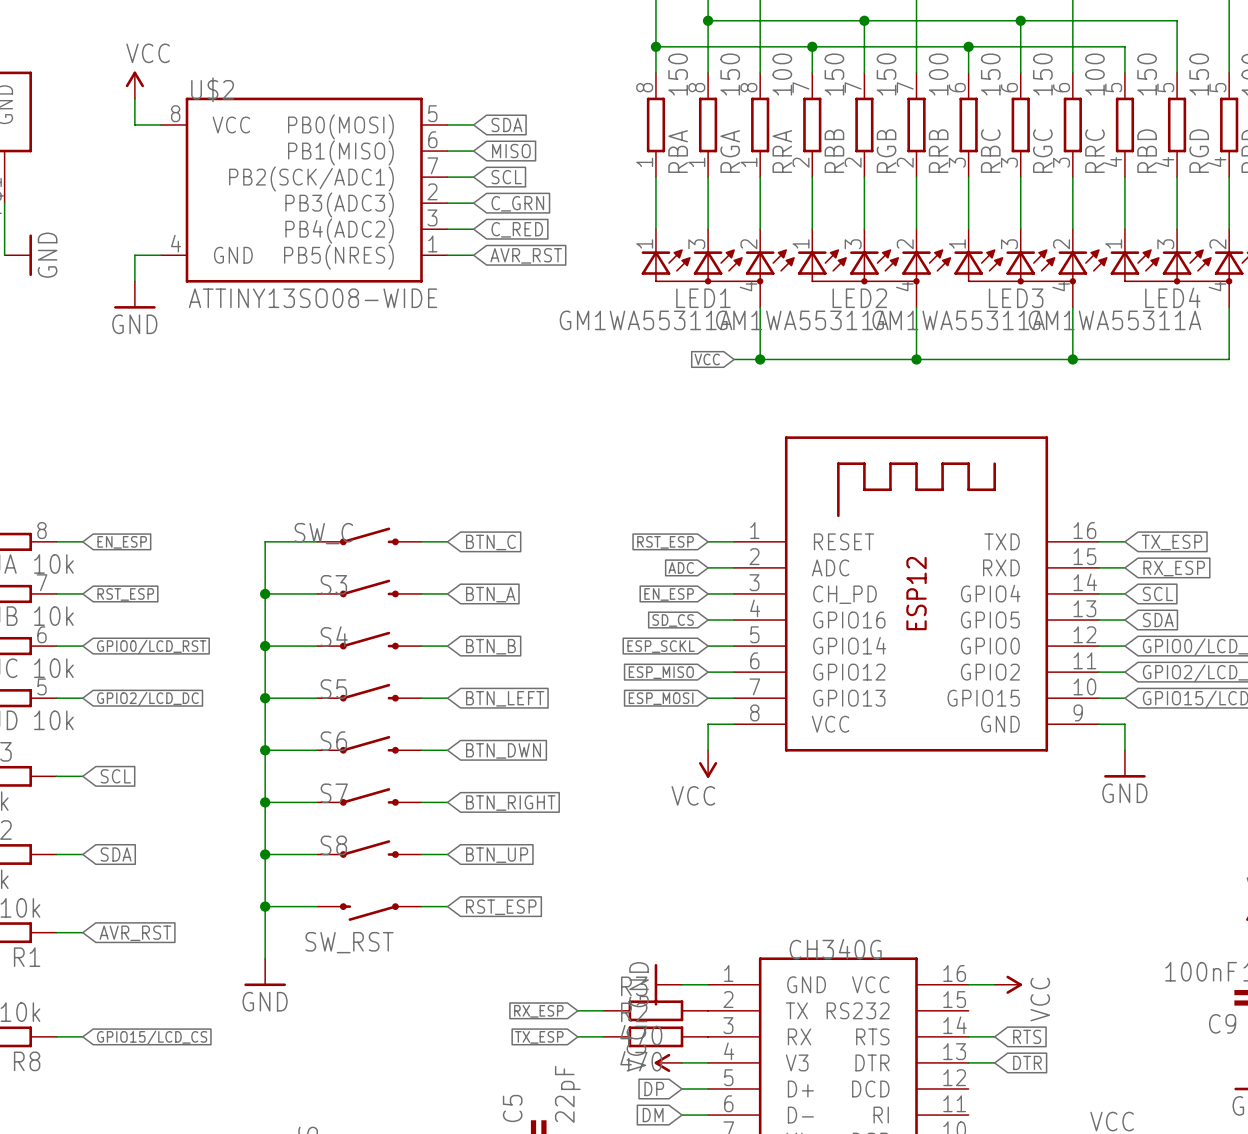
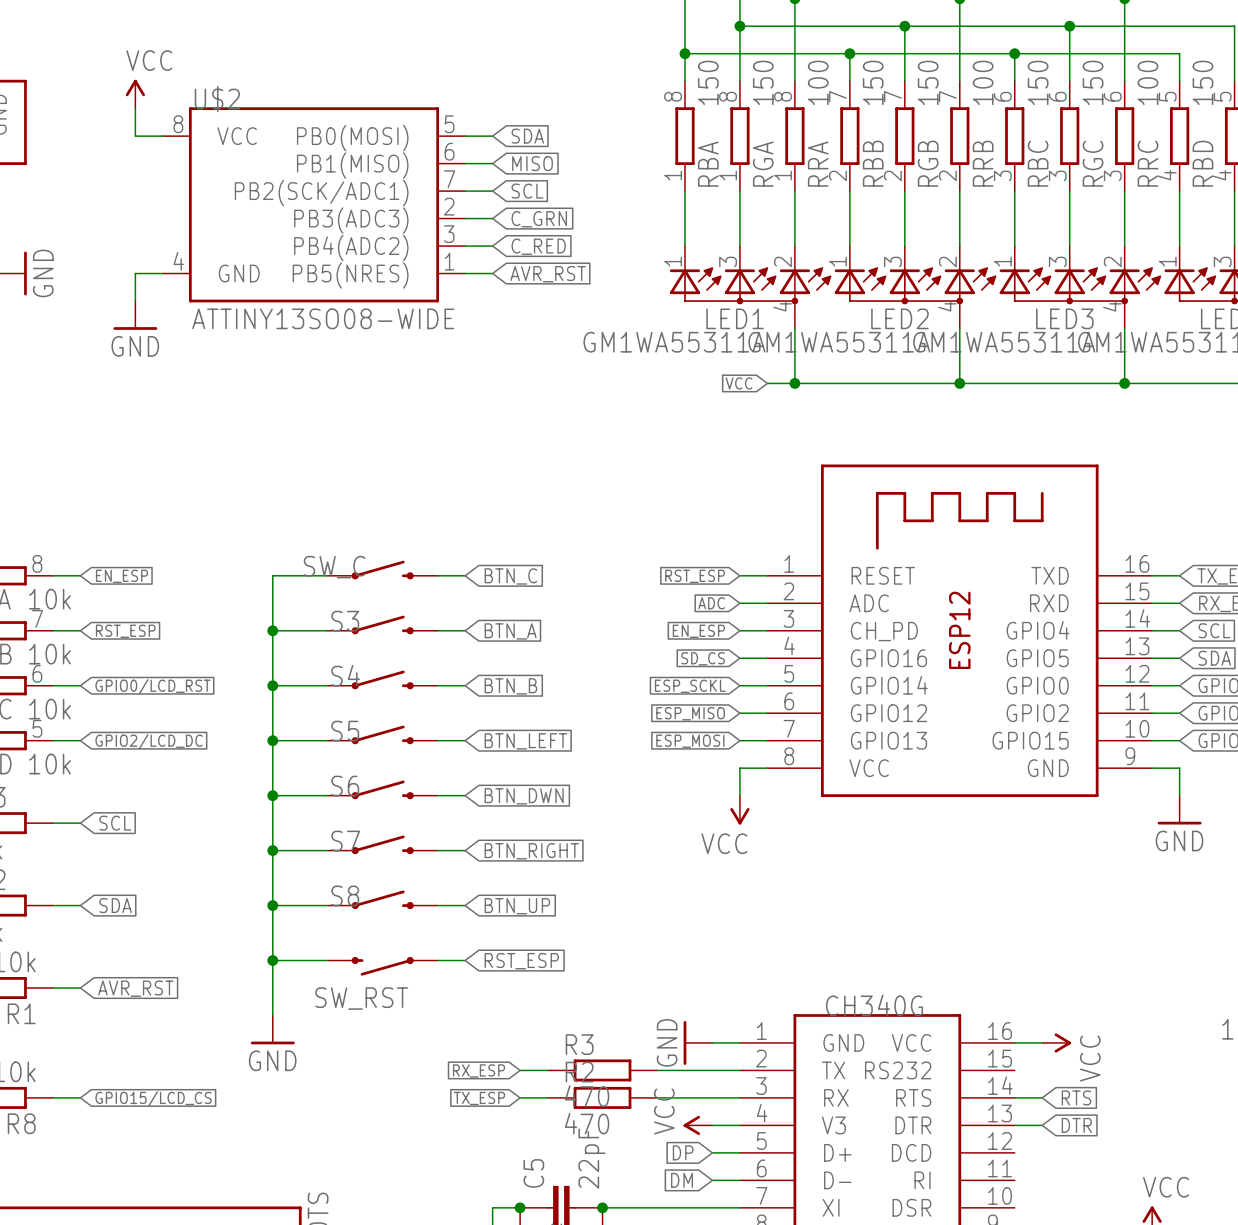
wire: (577, 1010) (603, 1010) -> (520, 1070) (547, 1070)
wire: none -> (657, 1070) (739, 1070)
R3 position: (655, 1010) -> (602, 1070)
global label position: RX_ESP (538, 1011) -> RX_ESP (479, 1070)
wire: (577, 1036) (603, 1036) -> (520, 1097) (547, 1097)
wire: none -> (657, 1097) (739, 1097)
R2 position: (655, 1036) -> (602, 1097)
global label position: TX_ESP (539, 1037) -> TX_ESP (479, 1098)

